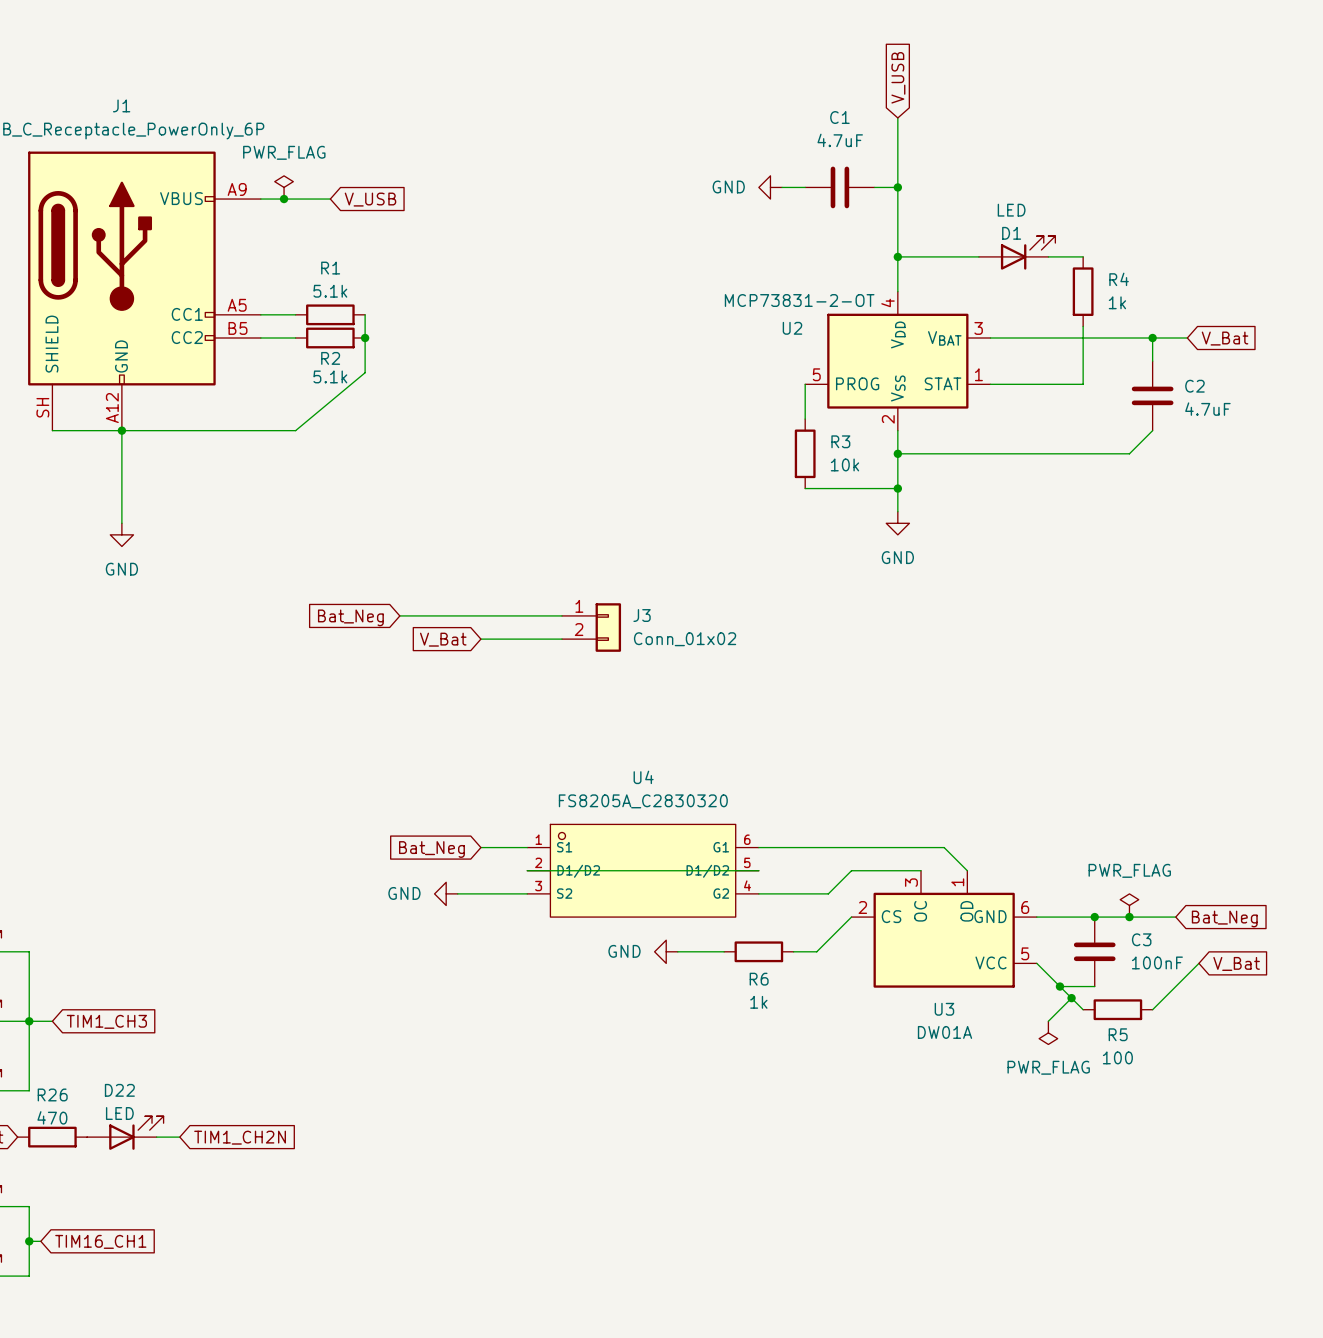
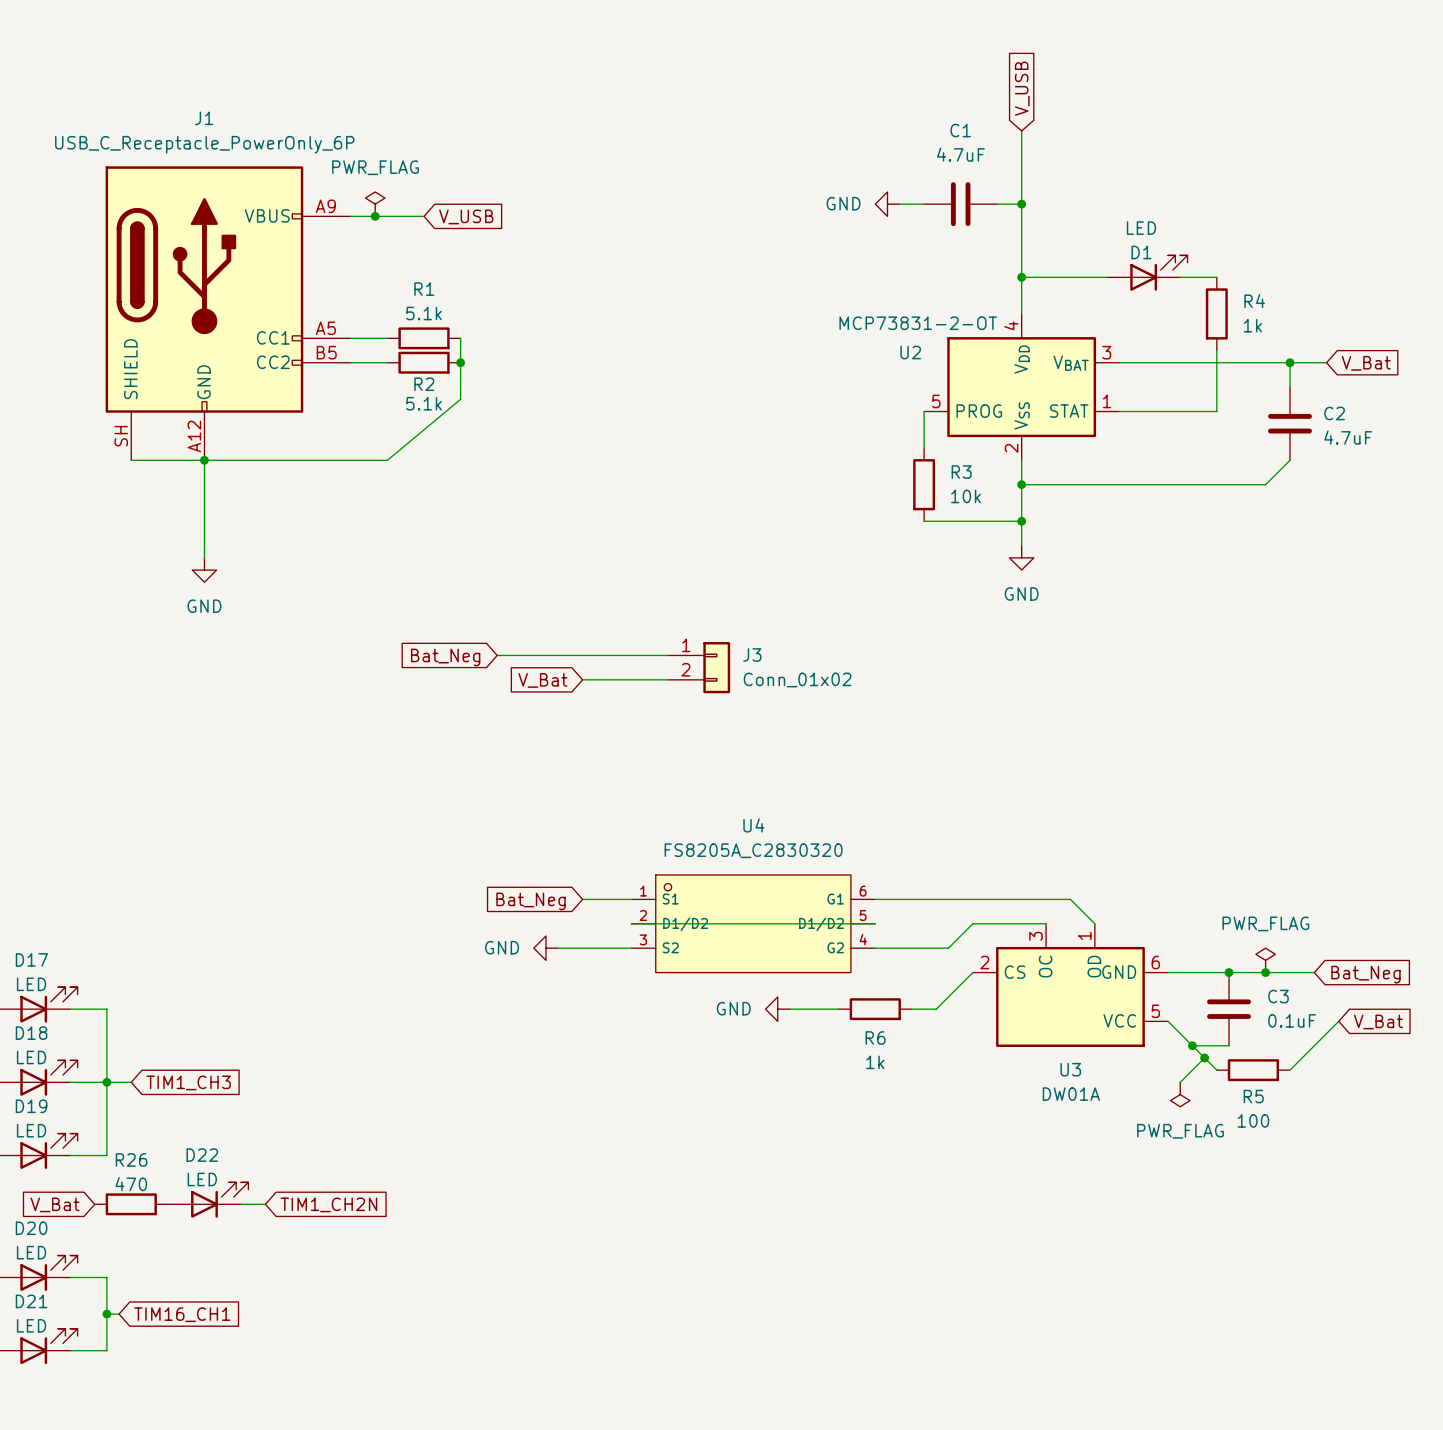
C3 value: 100nF (1157, 962) -> 0.1uF (1292, 1020)

